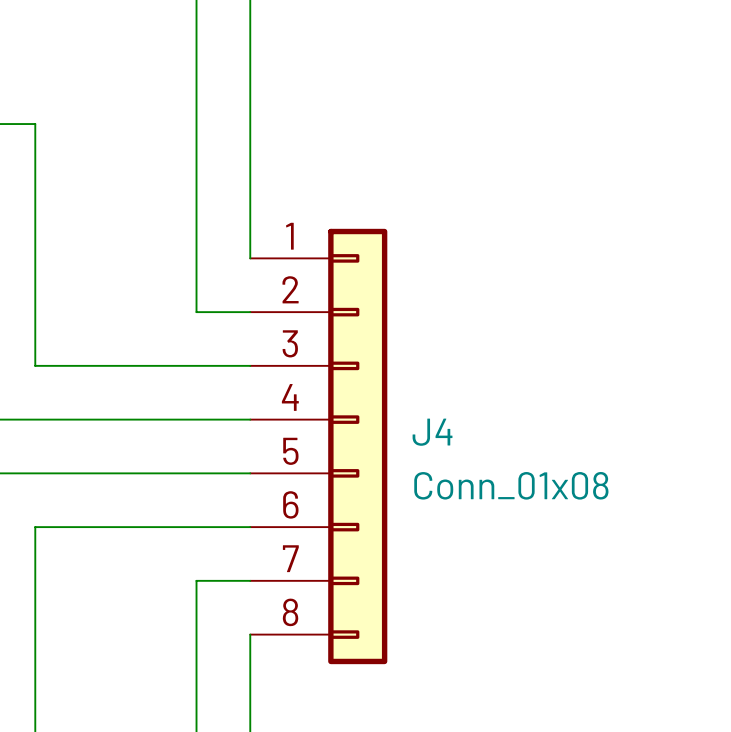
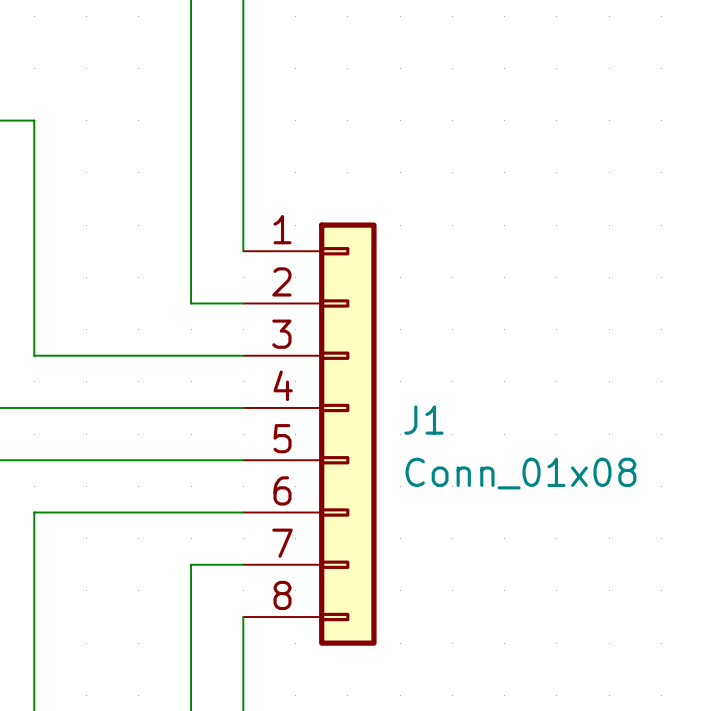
J4 name: J4 (432, 432) -> J1 (423, 420)

